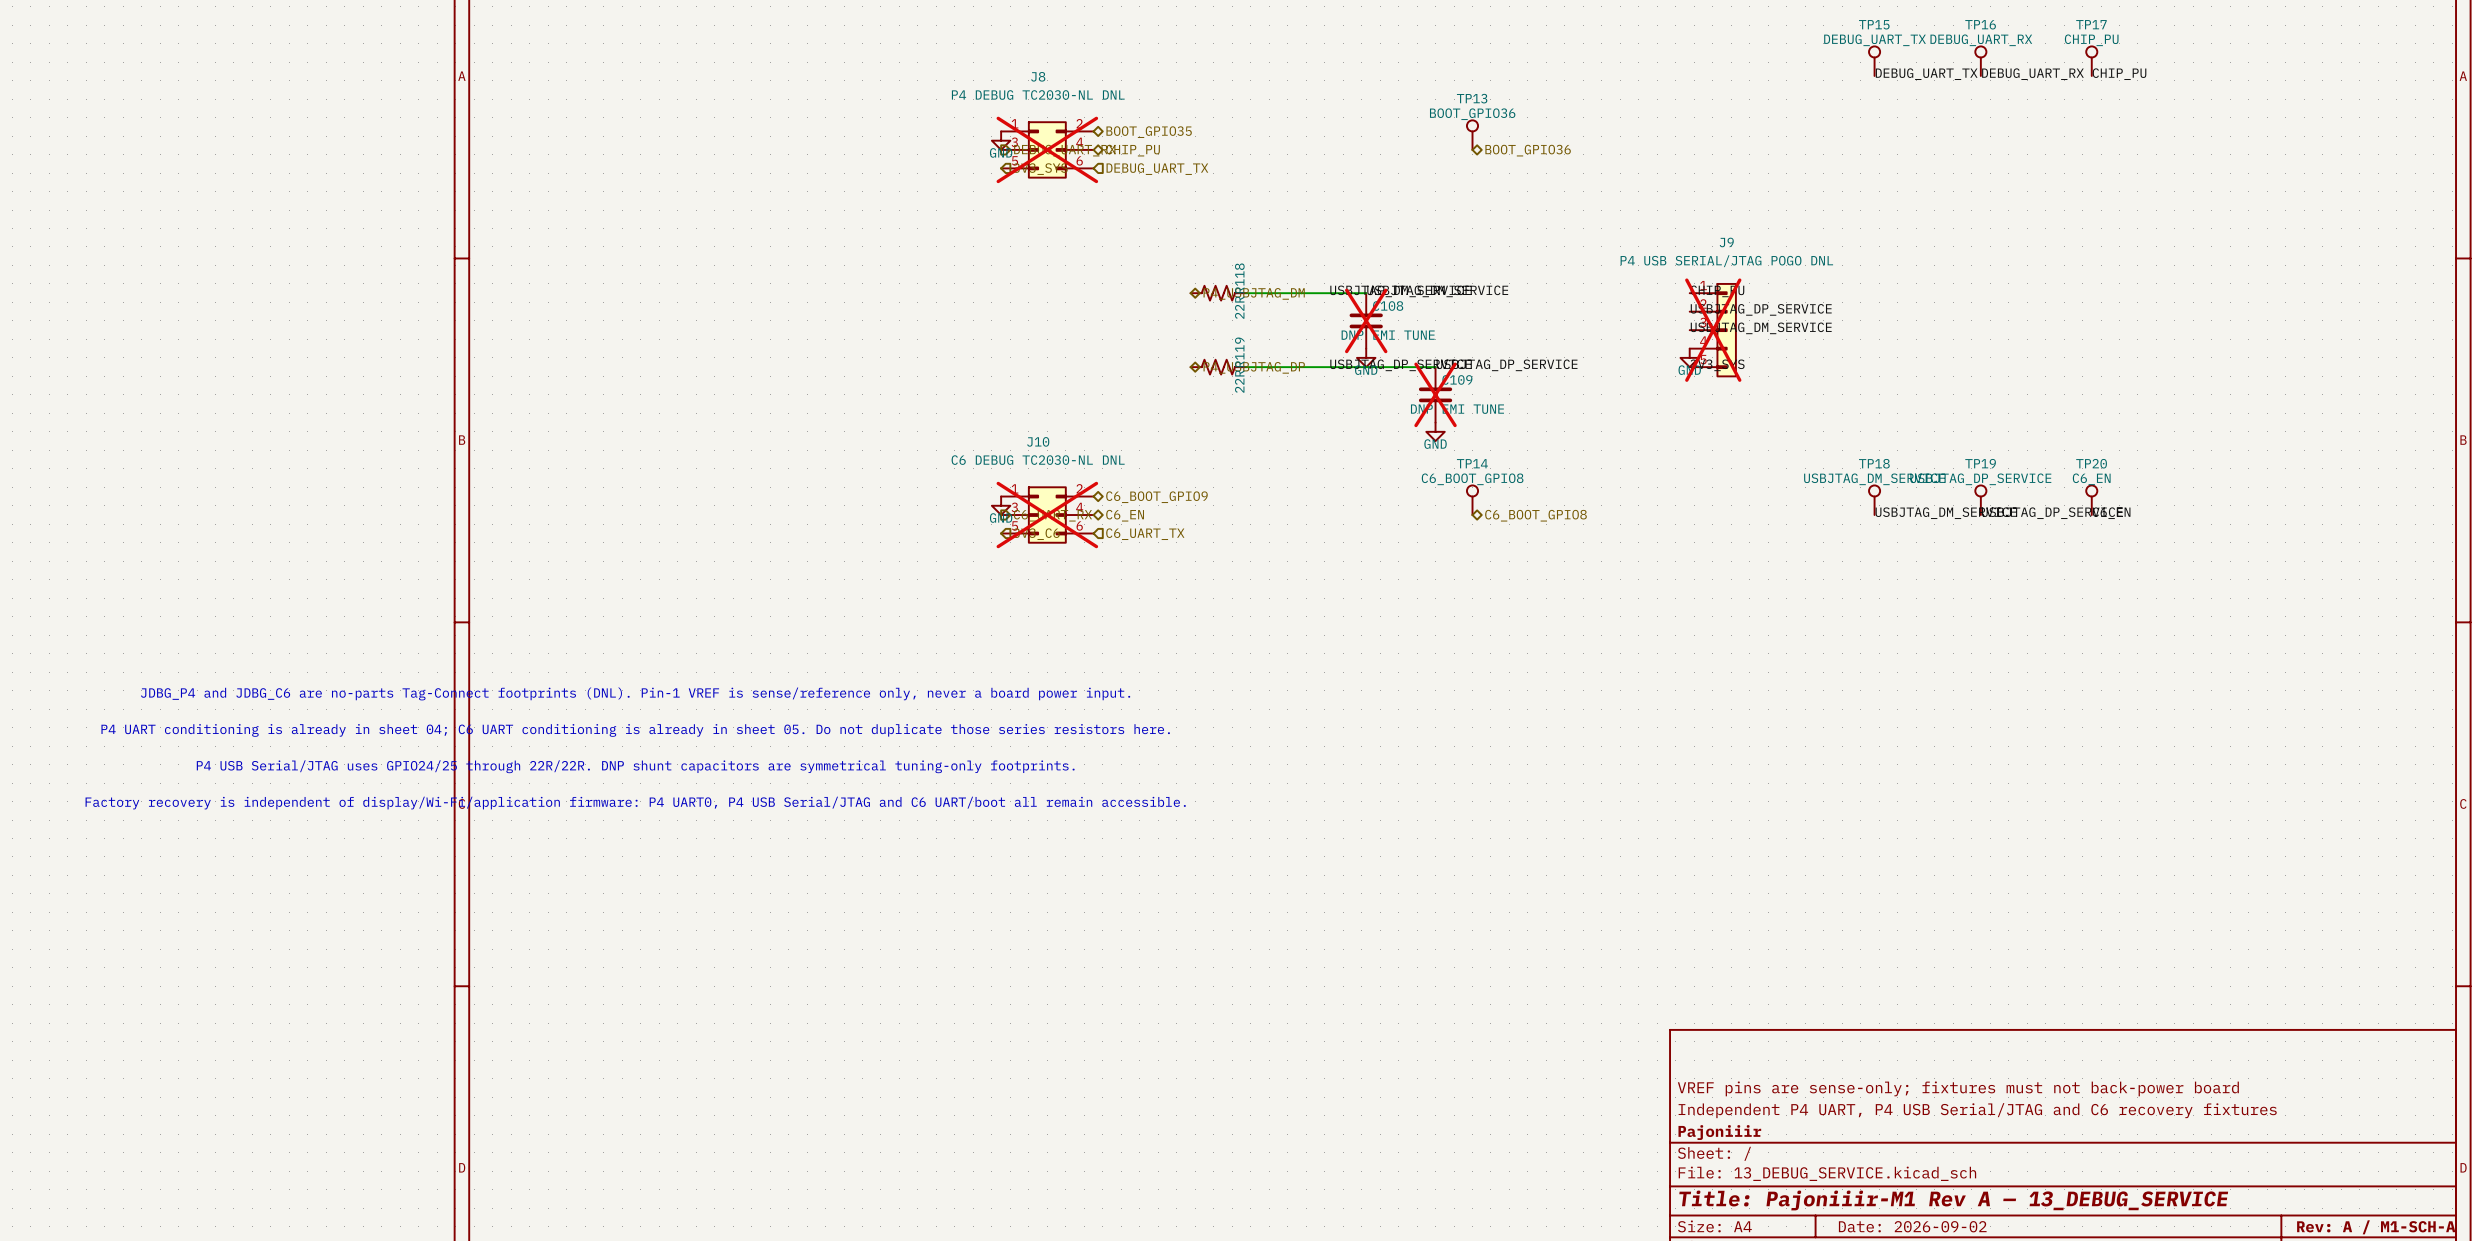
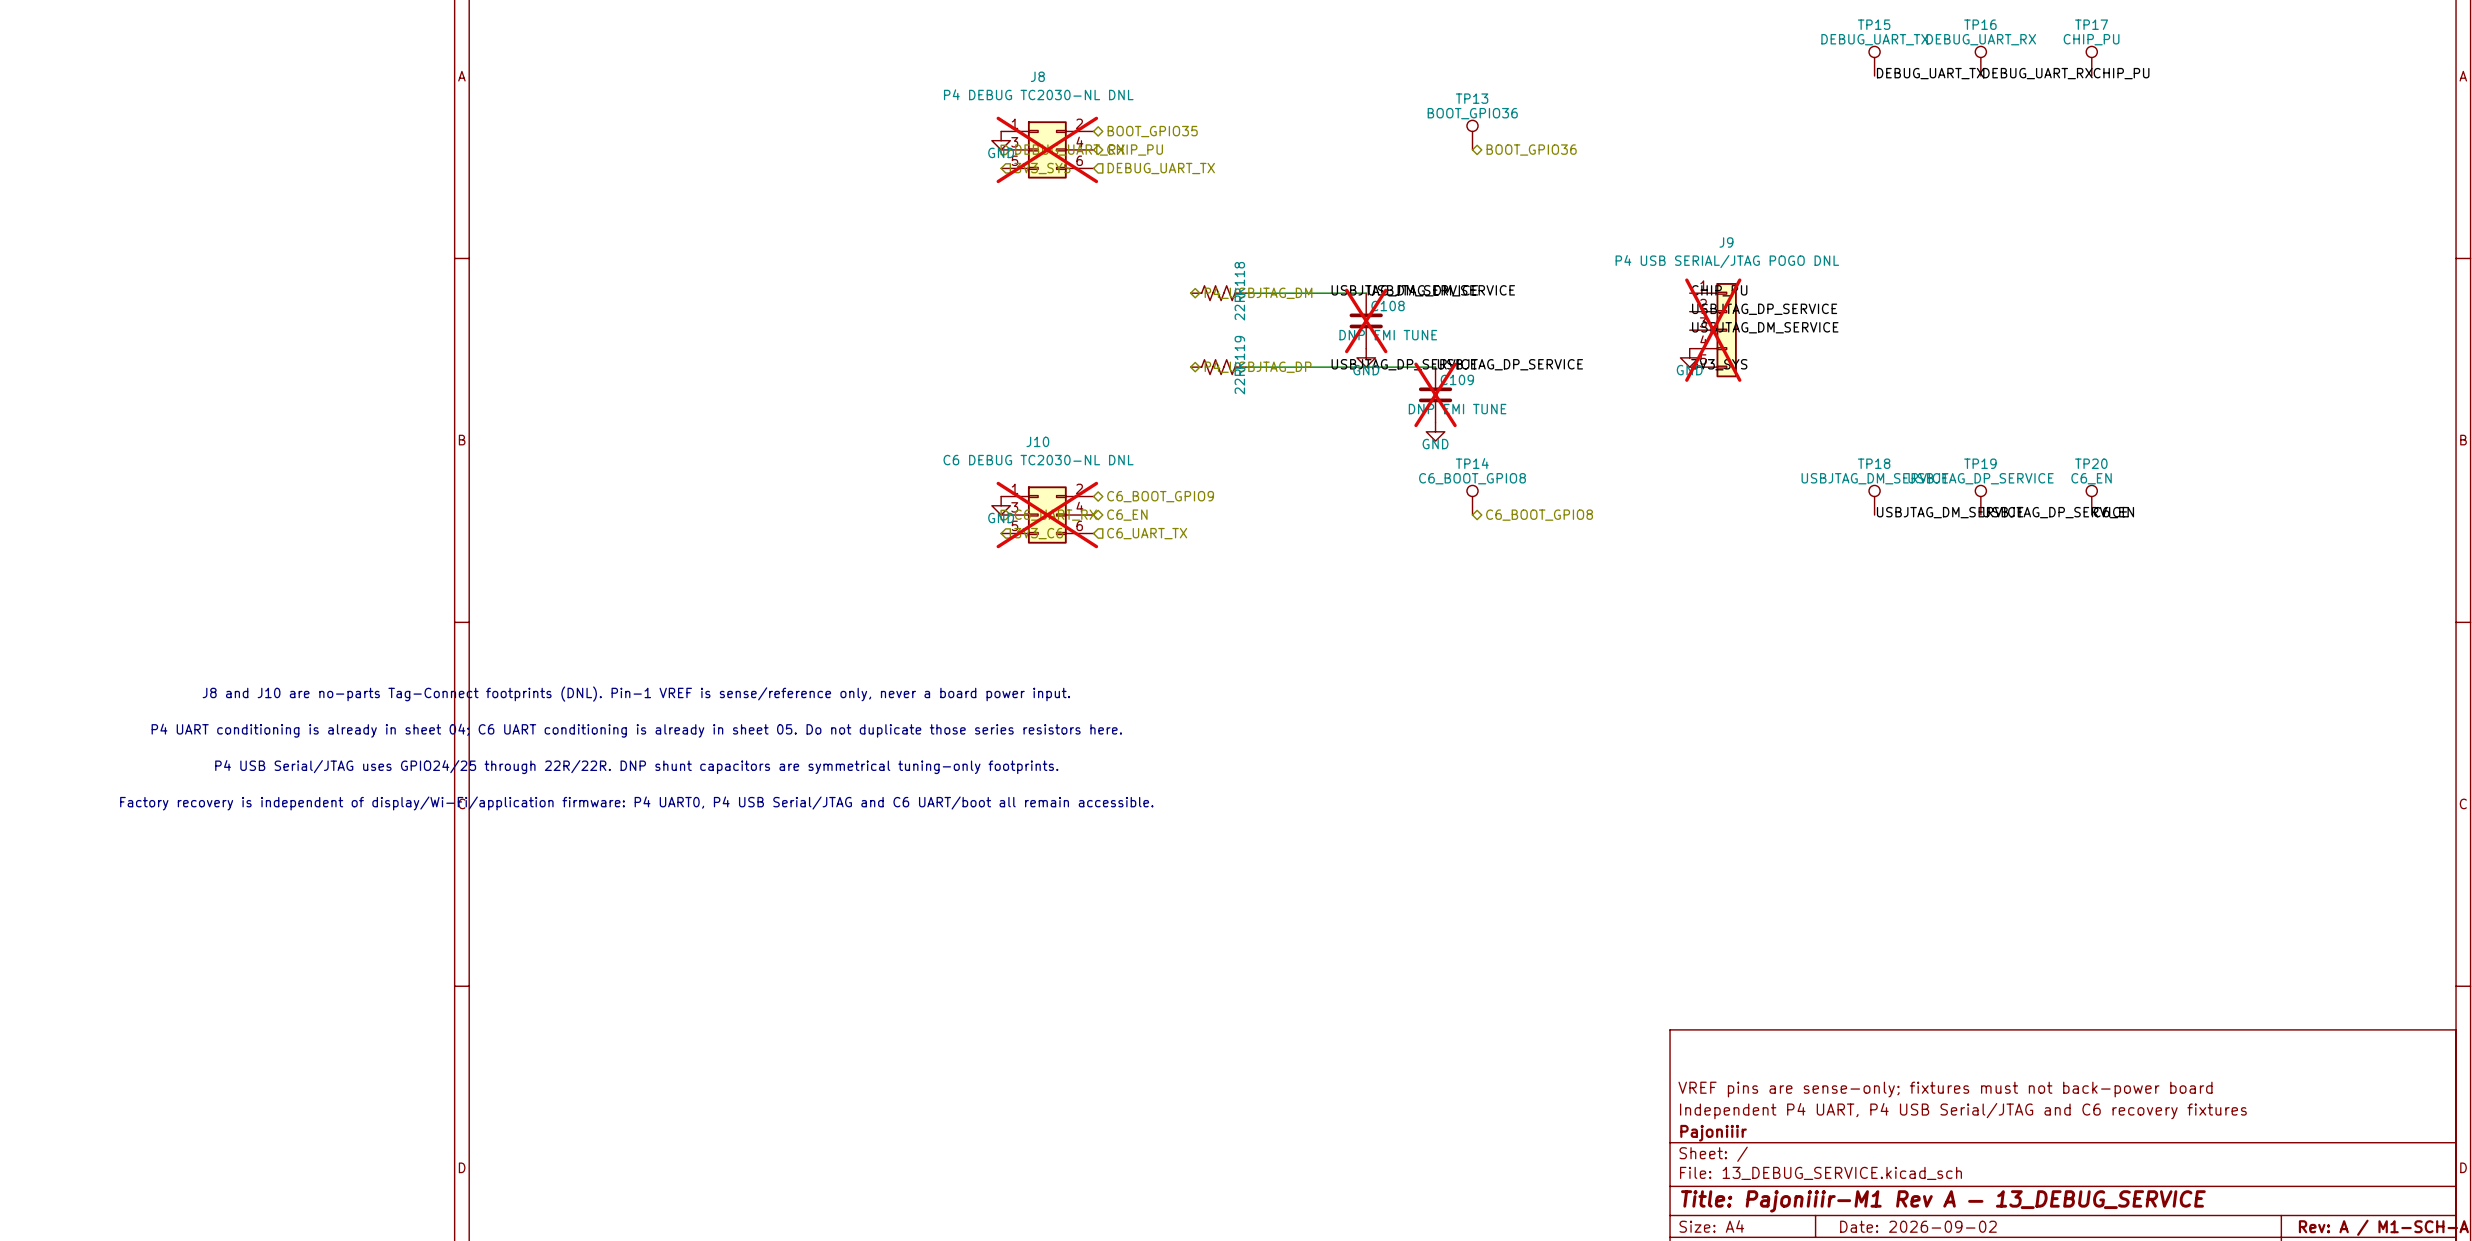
text: JDBG_P4 and JDBG_C6 are no-parts Tag-Connect footprints (DNL). Pin-1 VREF is sense/reference only, never a board power input. (635, 693) -> J8 and J10 are no-parts Tag-Connect footprints (DNL). Pin-1 VREF is sense/reference only, never a board power input. (636, 694)

